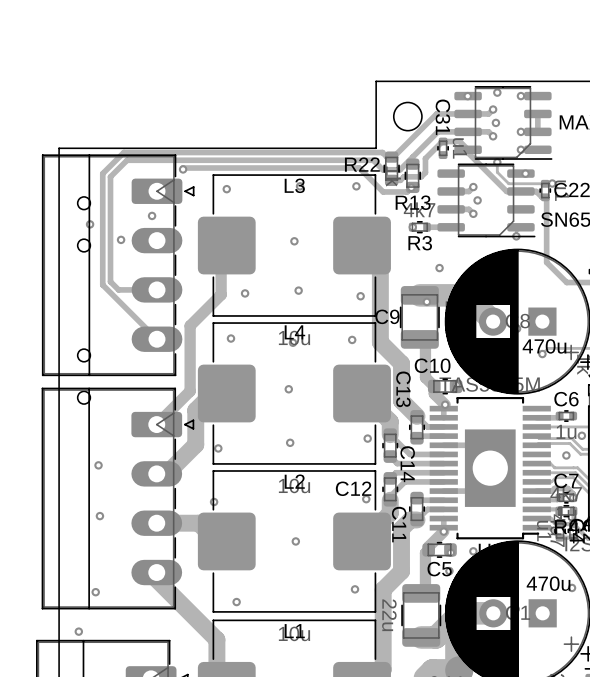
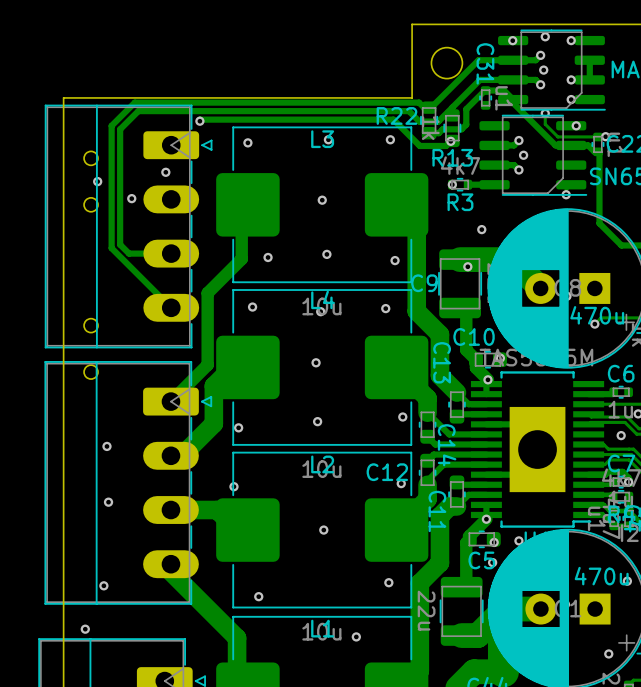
via: none -> (356, 636)
via: none -> (608, 653)

